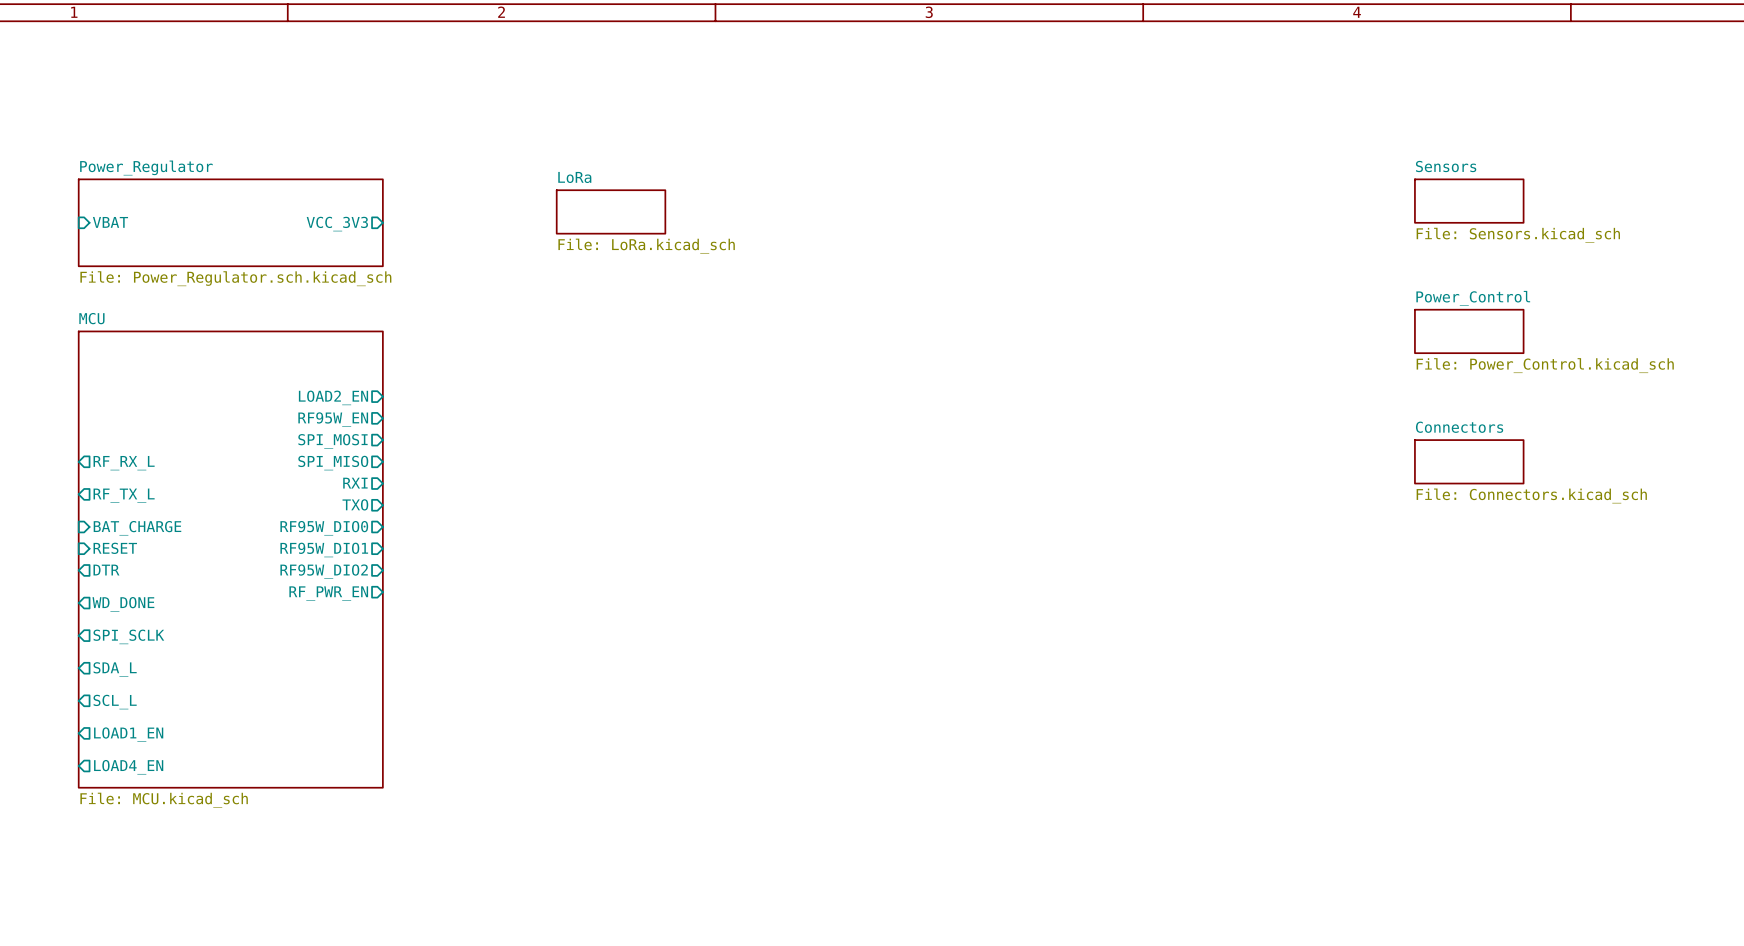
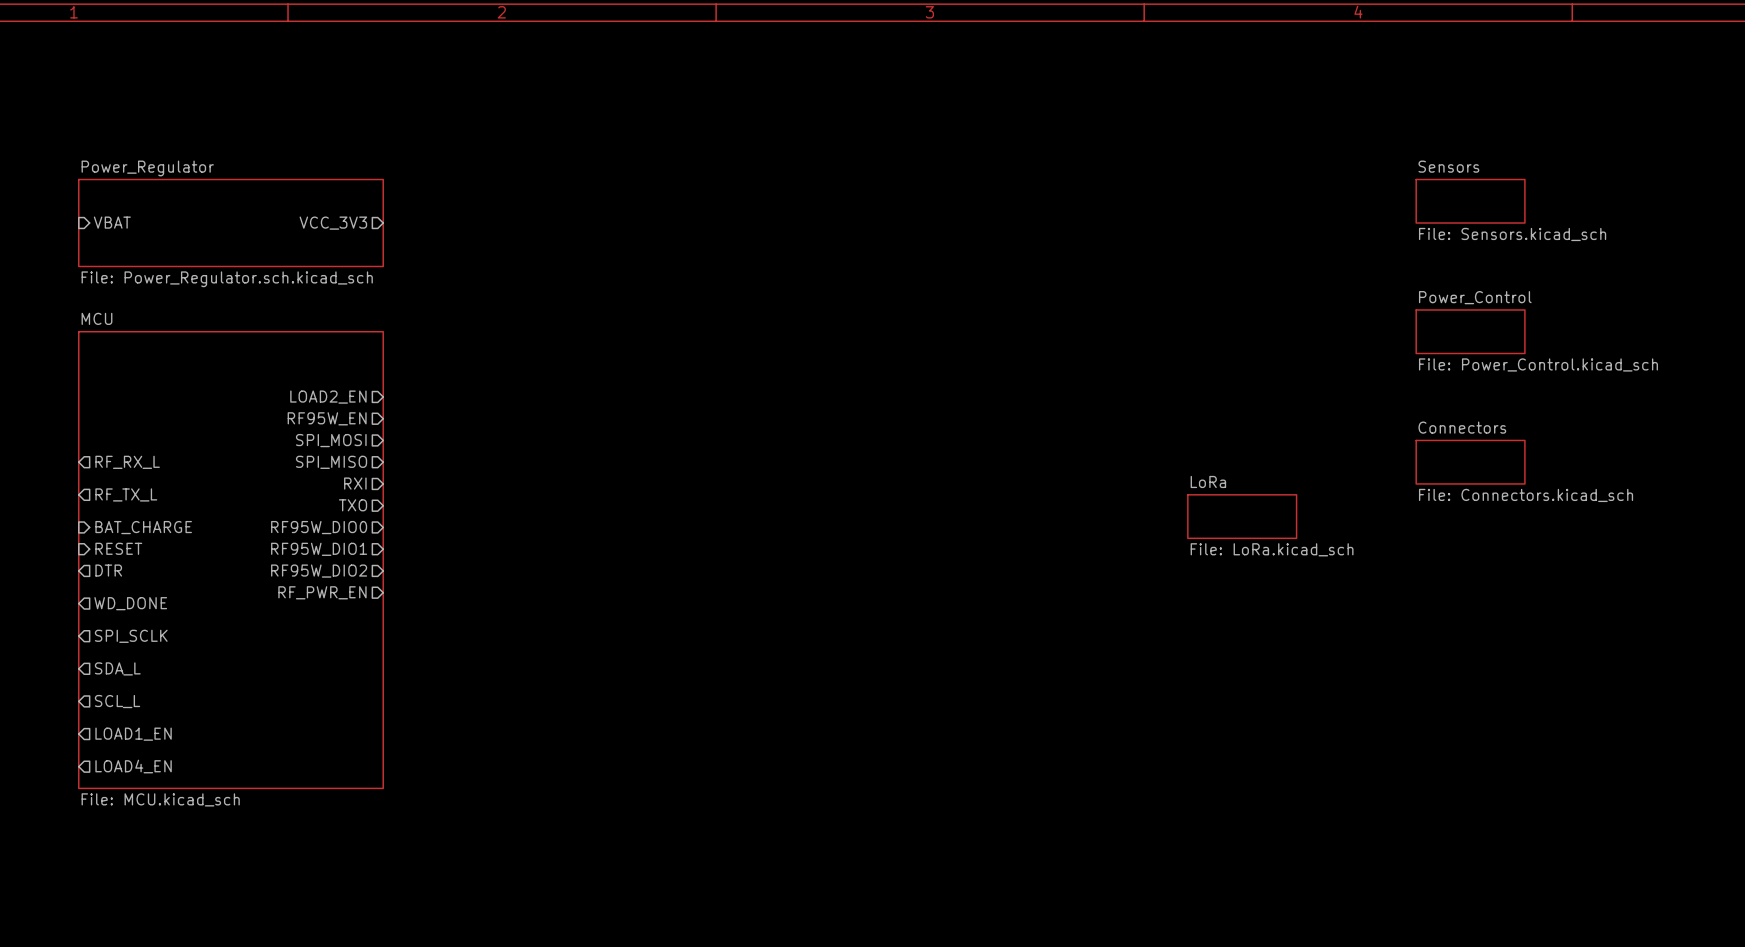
sheet LoRa: File: LoRa.kicad_sch (611, 211) -> none
sheet LoRa: none -> File: LoRa.kicad_sch (1242, 516)

